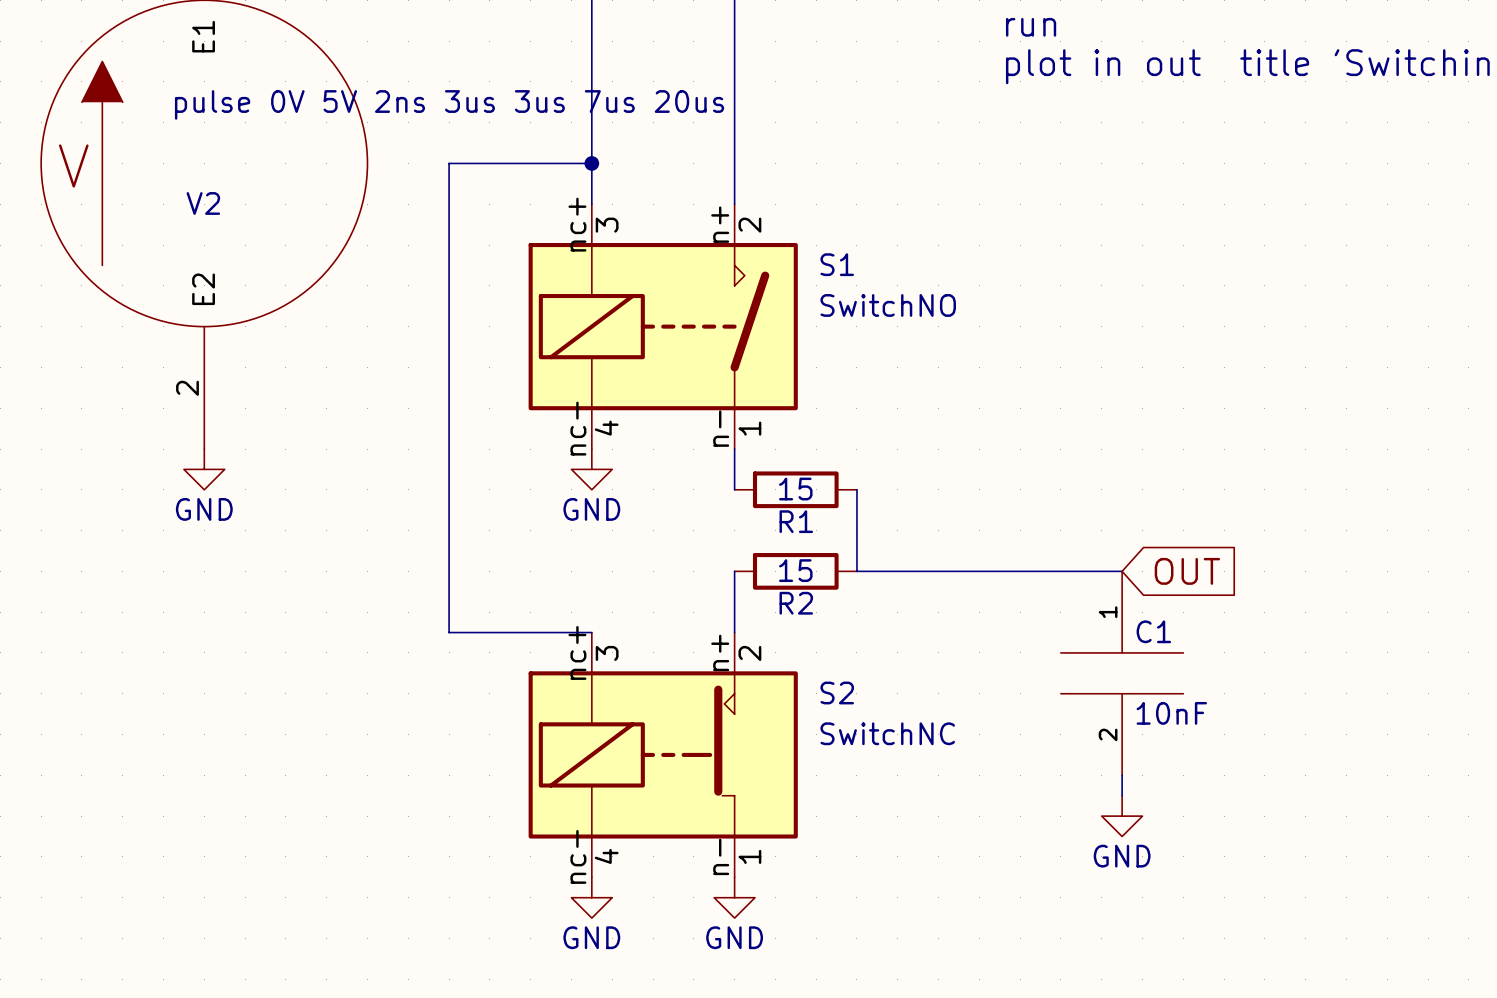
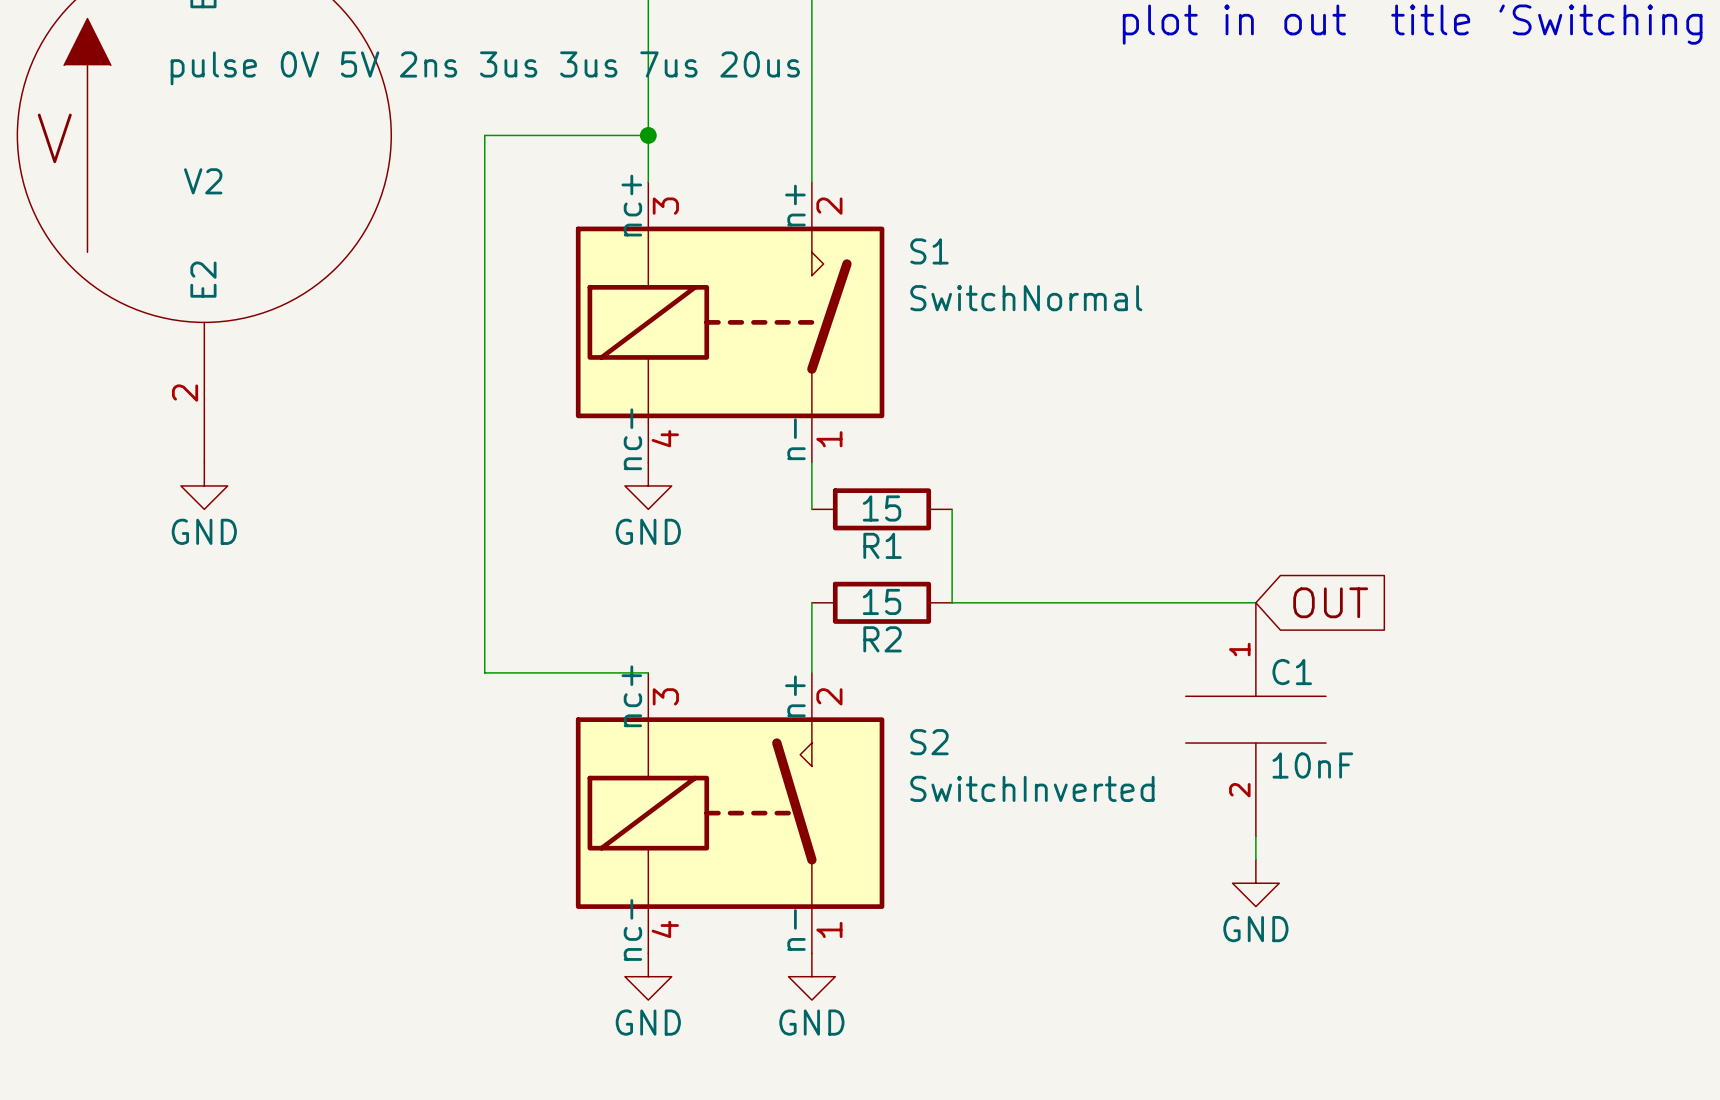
S1 value: SwitchNO (888, 305) -> SwitchNormal (1026, 298)
S2 symbol: [528, 632, 798, 878] -> [575, 672, 885, 954]
S2 value: SwitchNC (887, 733) -> SwitchInverted (1032, 788)

